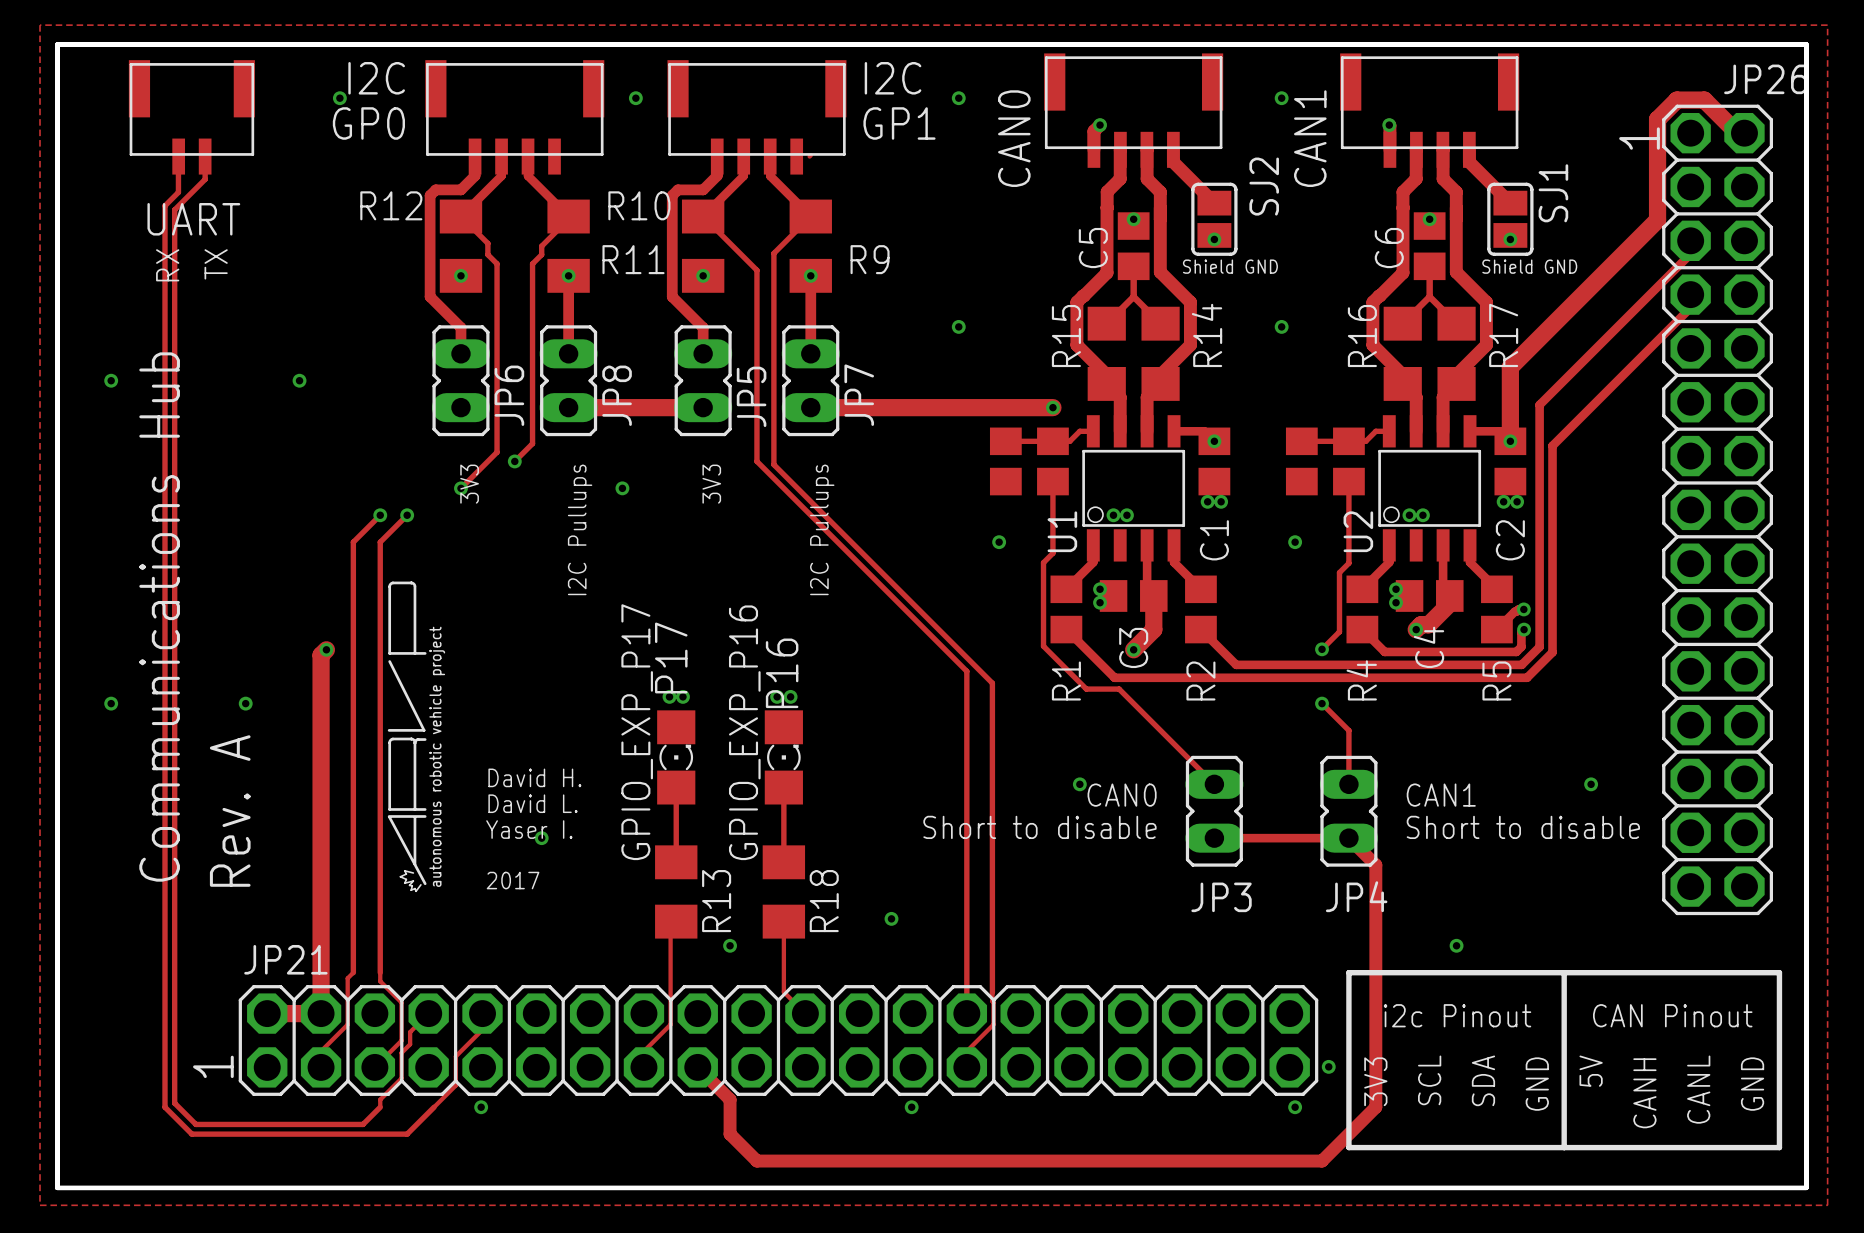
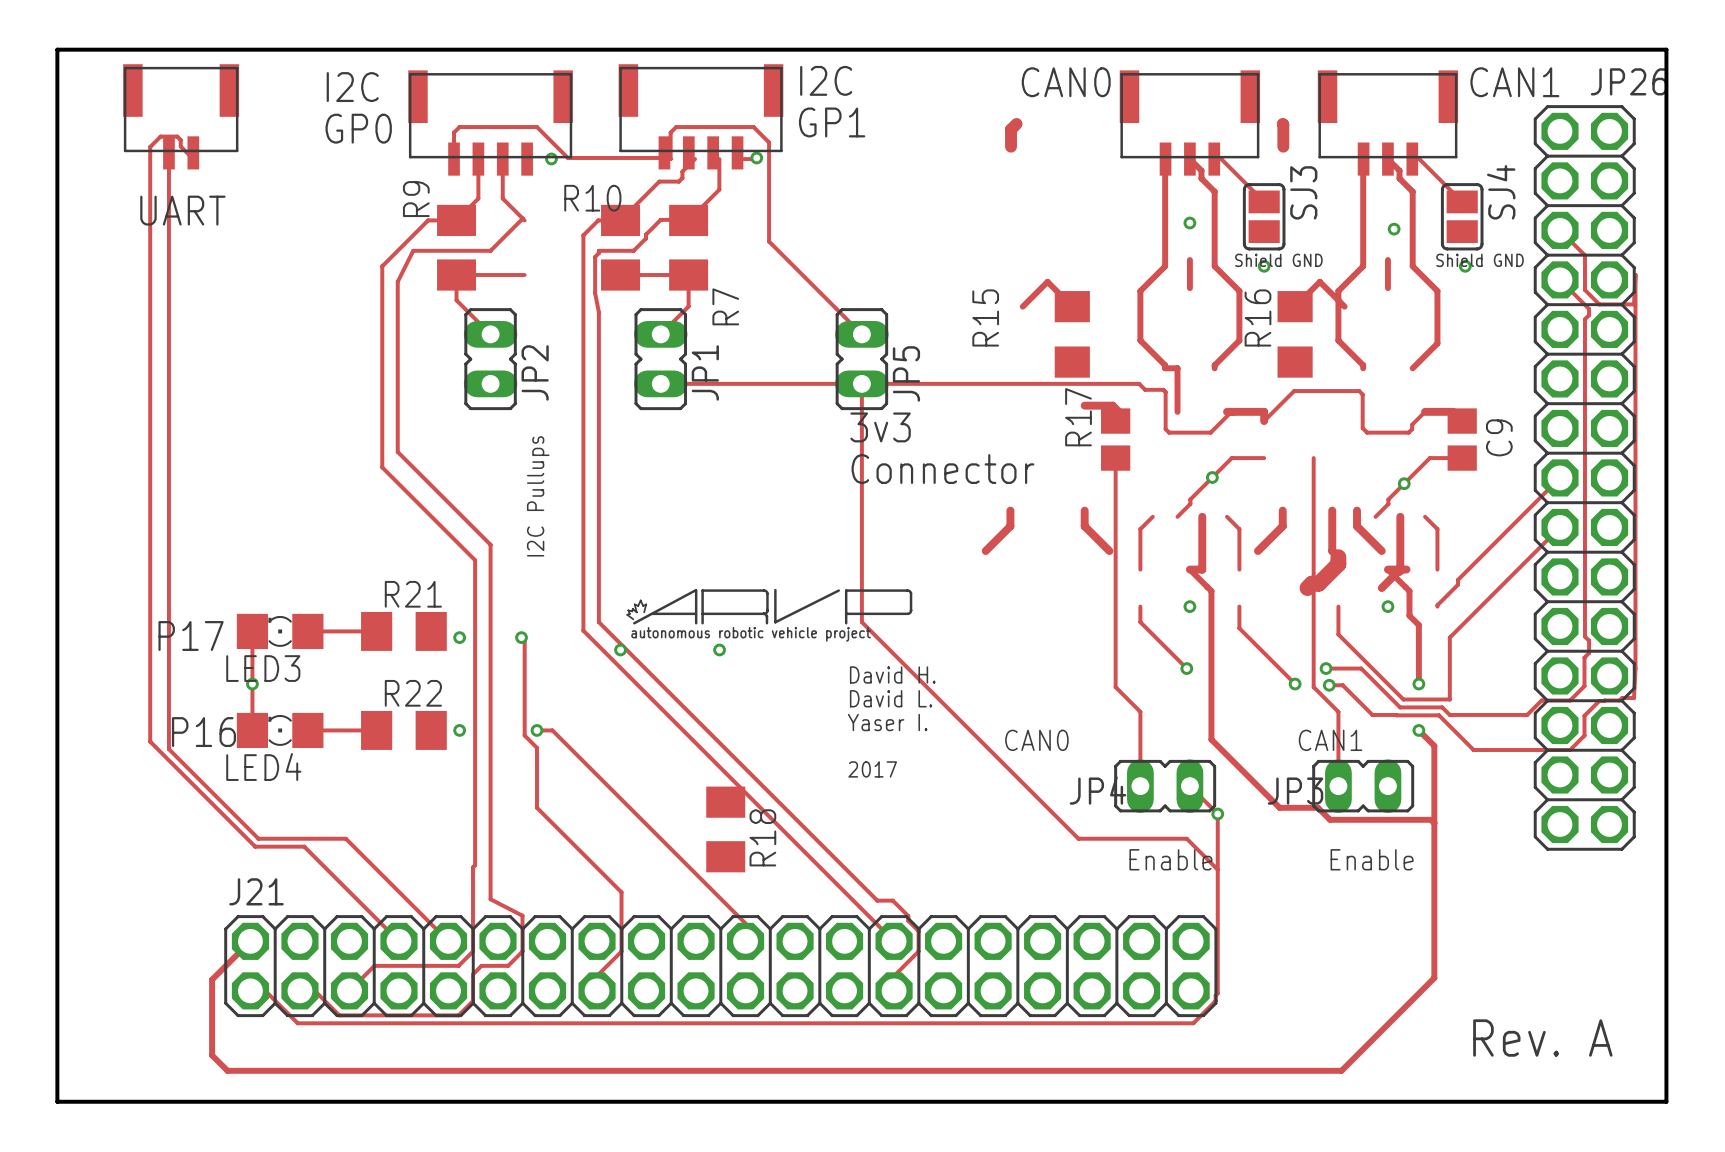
zone outline: (40, 25) (1827, 25) (1827, 1205) (40, 1205) (40, 25) -> none
text position: I2C (376, 78) -> I2C (352, 87)
via: (339, 98) -> none
via: (635, 98) -> none
via: (958, 98) -> none
via: (1281, 98) -> none
part: (1133, 110) -> none
part: (1429, 110) -> none
part position: (514, 117) -> (490, 123)
text position: GP0 (368, 123) -> GP0 (358, 128)
part: none -> (1189, 123)
part: none -> (1387, 123)
via: (1100, 125) -> none
via: (1389, 125) -> none
track: (1744, 133) (1737, 133) (1704, 100) (1676, 100) (1657, 119) (1657, 220) (1510, 367) (1510, 441) (1500, 431) (1470, 431) -> none
text rotation: 0° (1014, 138) -> 90° clockwise (1066, 82)
text position: CAN0 (1014, 138) -> CAN0 (1066, 82)
text rotation: 0° (1310, 138) -> 90° clockwise (1514, 82)
text position: CAN1 (1310, 138) -> CAN1 (1514, 82)
text: 1 (1639, 138) -> none
track: (1173, 149) (1173, 162) (1214, 203) -> none
track: (1469, 149) (1469, 162) (1510, 203) -> none
track: (1120, 150) (1120, 178) (1107, 191) (1107, 207) -> none
track: (1147, 150) (1147, 178) (1160, 192) (1160, 272) (1190, 302) (1190, 345) (1160, 374) (1160, 383) (1147, 397) (1147, 431) -> none
track: (1416, 150) (1416, 178) (1403, 192) (1403, 272) (1372, 302) (1372, 345) (1402, 374) (1402, 383) (1416, 397) (1416, 431) -> none
track: (1443, 150) (1443, 178) (1456, 192) (1456, 272) (1486, 302) (1486, 345) (1456, 374) (1456, 383) (1443, 397) (1443, 431) -> none
track: (810, 155) (809, 156) -> none
track: (178, 156) (178, 192) (164, 205) (164, 1107) (191, 1134) (407, 1134) (455, 1085) (455, 1056) (482, 1029) (482, 1013) -> (168, 159) (168, 749) (258, 838) (345, 838) (448, 941)
track: (205, 156) (205, 179) (174, 209) (174, 1103) (195, 1124) (363, 1124) (380, 1107) (380, 1099) (401, 1078) (401, 1052) (410, 1044) (410, 1032) (428, 1013) -> (193, 159) (180, 146) (180, 140) (177, 136) (160, 136) (150, 147) (150, 741) (255, 846) (304, 846) (398, 941)
track: (475, 156) (475, 175) (460, 189) (435, 189) (430, 195) (430, 296) (460, 327) (460, 353) -> none
track: (501, 156) (501, 175) (460, 216) (487, 243) (487, 254) (497, 263) (497, 452) (460, 488) -> none
track: (528, 156) (528, 175) (568, 216) (568, 219) (541, 246) (541, 254) (532, 263) (532, 443) (514, 461) -> none
track: (717, 156) (717, 175) (703, 189) (677, 189) (672, 195) (672, 296) (703, 327) (703, 353) -> none
track: (743, 156) (743, 175) (703, 216) (756, 270) (756, 461) (966, 671) (966, 1013) -> (695, 159) (682, 171) (682, 178) (678, 181) (659, 181) (620, 220) (598, 220) (583, 235) (583, 630) (894, 941)
track: none -> (756, 157) (743, 159)
via: none -> (756, 157)
track: none -> (454, 159) (454, 132) (459, 127) (536, 127) (567, 157) (670, 159) (670, 132) (676, 127) (753, 127) (769, 142) (769, 241) (861, 334)
track: none -> (502, 159) (502, 198) (524, 220)
via: none -> (551, 158)
track: none -> (1165, 159) (1165, 266) (1140, 291) (1140, 340) (1165, 365) (1165, 368) (1177, 368) (1177, 411)
track: none -> (1189, 159) (1201, 170) (1201, 178) (1214, 191) (1214, 266) (1239, 291) (1239, 340) (1214, 365) (1214, 368)
track: none -> (1214, 159) (1221, 159) (1264, 201)
track: none -> (1363, 159) (1363, 266) (1338, 291) (1338, 340) (1363, 365) (1363, 368)
track: none -> (1387, 159) (1399, 170) (1399, 178) (1412, 191) (1412, 266) (1437, 291) (1437, 343) (1412, 368)
track: none -> (1412, 159) (1419, 159) (1462, 201)
track: (770, 172) (770, 176) (810, 216) (773, 253) (773, 464) (992, 683) (992, 1001) -> (719, 159) (719, 189) (688, 220) (660, 219) (633, 250) (598, 250) (595, 256) (595, 293) (598, 312) (598, 622) (877, 900) (892, 900) (908, 916) (908, 920) (917, 930)
track: (1107, 207) (1107, 272) (1076, 302) (1076, 345) (1106, 374) (1106, 383) (1120, 397) (1120, 431) -> none
via: (1133, 219) -> none
SJ2: (1214, 219) -> none
via: (1429, 219) -> none
SJ1: (1510, 219) -> none
SJ3: none -> (1264, 216)
SJ4: none -> (1462, 216)
via: none -> (1189, 223)
via: (1214, 239) -> none
track: (1690, 240) (1690, 253) (1539, 404) (1539, 646) (1521, 664) (1236, 664) (1200, 629) -> (1559, 230) (1584, 255) (1584, 290) (1599, 304) (1634, 304) (1635, 274) (1634, 698) (1599, 700) (1584, 715) (1584, 735) (1570, 750) (1473, 750) (1438, 715) (1372, 714) (1342, 685) (1329, 685)
R12: (460, 246) -> none
R10 position: (568, 246) -> (620, 247)
R11: (703, 246) -> none
R9 position: (810, 246) -> (456, 247)
C5: (1133, 246) -> none
C6: (1429, 246) -> none
R7: none -> (688, 247)
R9 name rotation: 0° (870, 259) -> 90° counterclockwise (416, 199)
R9 name position: R9 (870, 259) -> R9 (416, 199)
text: TX (216, 264) -> none
text: RX (167, 265) -> none
track: (1133, 266) (1133, 296) -> (1189, 260) (1189, 288)
text: Shield GND (1230, 266) -> none
track: (1429, 266) (1429, 296) -> (1387, 260) (1387, 288)
text position: Shield GND (1529, 266) -> Shield GND (1480, 260)
text: none -> Shield GND (1278, 260)
via: (460, 275) -> none
track: (568, 275) (568, 353) -> none
via: (568, 275) -> none
via: (703, 275) -> none
track: (810, 275) (810, 353) -> none
via: (810, 275) -> none
via: none -> (1264, 266)
via: none -> (1465, 266)
track: none -> (524, 275) (456, 275) (456, 300) (490, 334)
track: none -> (620, 275) (688, 275) (688, 306) (660, 334)
track: (1690, 294) (1690, 307) (1552, 445) (1552, 652) (1527, 677) (1114, 677) (1066, 629) -> (1559, 279) (1589, 308) (1589, 315) (1584, 319) (1584, 636) (1589, 640) (1589, 653) (1584, 657) (1584, 686) (1570, 700) (1541, 700) (1527, 714) (1449, 714) (1442, 707) (1400, 707) (1361, 668) (1326, 668)
R17 footprint: [1437, 306, 1476, 401] -> [1101, 408, 1131, 471]
via: (958, 326) -> none
via: (1281, 326) -> none
R17 name position: R17 (1503, 335) -> R17 (1078, 417)
R14: (1106, 353) -> none
via: (111, 380) -> none
via: (299, 380) -> none
JP6: (460, 380) -> none
JP2: none -> (490, 359)
JP8: (568, 380) -> none
JP5 position: (703, 380) -> (861, 359)
JP1: none -> (660, 359)
JP7: (810, 380) -> none
track: (568, 407) (703, 407) -> none
track: none -> (660, 383) (750, 383)
track width: thick (810, 407) (1052, 407) -> thin (750, 383) (973, 383)
track: none -> (861, 383) (861, 622) (1078, 838) (1186, 838) (1217, 869)
track: none -> (973, 383) (1139, 383) (1145, 389) (1163, 389) (1165, 392) (1165, 429) (1169, 432) (1210, 432) (1233, 411)
via: (1052, 407) -> none
track: (1093, 431) (1079, 431) (1069, 441) (1005, 441) -> none
track: (1389, 431) (1375, 431) (1365, 441) (1301, 441) -> none
track: none -> (1227, 411) (1264, 411) (1264, 421) (1294, 391) (1359, 391) (1362, 394) (1362, 428) (1367, 432) (1408, 432) (1412, 429) (1412, 424) (1425, 411) (1453, 411) (1462, 421)
via: (1214, 441) -> none
via: (1510, 441) -> none
text: none -> 3v3 (880, 427)
via: (514, 461) -> none
part: (1005, 461) -> none
part: (1052, 461) -> none
C1: (1214, 461) -> none
part: (1301, 461) -> none
part: (1348, 461) -> none
C2: (1510, 461) -> none
C9: none -> (1462, 439)
track: (1052, 481) (1052, 553) (1043, 562) (1043, 646) (1086, 689) (1119, 689) (1214, 784) -> none
track: (1348, 481) (1348, 563) (1339, 572) (1339, 631) (1322, 649) -> none
text: 3V3 (469, 484) -> none
text: 3V3 (711, 484) -> none
via: (460, 488) -> none
via: (622, 488) -> none
U1: (1133, 488) -> none
track: none -> (1115, 458) (1115, 687) (1140, 711) (1140, 786)
track: none -> (1264, 458) (1231, 458) (1190, 499) (1190, 503) (1177, 516)
track: none -> (1313, 458) (1313, 687) (1338, 711) (1338, 786)
U2: (1429, 488) -> none
track: none -> (1462, 458) (1429, 458) (1388, 499) (1388, 503) (1375, 516)
text: none -> Connector (942, 469)
via: (1207, 501) -> none
via: (1221, 501) -> none
via: (1503, 501) -> none
via: (1517, 501) -> none
track: none -> (1559, 477) (1458, 579) (1458, 584) (1437, 606)
track: (380, 515) (353, 542) (353, 972) (347, 978) (347, 1024) (321, 1051) (321, 1067) -> (522, 218) (490, 250) (413, 250) (397, 281) (397, 451) (490, 544) (490, 899) (522, 915) (522, 951) (508, 965) (481, 965) (473, 974) (473, 1001) (458, 1015) (339, 1015) (314, 990) (299, 990)
via: (380, 515) -> none
track: (407, 515) (380, 542) (380, 981) (401, 1002) (401, 1040) -> (478, 159) (478, 198) (456, 220) (428, 220) (382, 266) (382, 467) (475, 560) (475, 865) (473, 867) (473, 951) (458, 965) (373, 966)
via: (407, 515) -> none
via: (1113, 515) -> none
via: (1126, 515) -> none
via: (1409, 515) -> none
via: (1422, 515) -> none
via: none -> (1404, 483)
text: I2C Pullups (822, 529) -> none
via: (999, 542) -> none
via position: (1295, 542) -> (1212, 477)
track: (1147, 545) (1147, 589) (1153, 595) (1153, 629) (1133, 649) -> none
track: none -> (1152, 516) (1140, 529) (1140, 569)
track: none -> (1202, 516) (1202, 569) (1189, 569) (1211, 591) (1211, 739) (1279, 807) (1318, 807) (1330, 819) (1430, 819) (1434, 823)
track: none -> (1227, 516) (1239, 529) (1239, 569)
track: none -> (1400, 516) (1400, 569) (1387, 569) (1409, 591) (1409, 615) (1418, 625) (1418, 684)
track: none -> (1425, 516) (1437, 529) (1437, 569)
track: none -> (1559, 527) (1449, 637) (1449, 699) (1403, 699) (1338, 634) (1338, 606)
drawing: [387, 581, 427, 892] -> none
via: (1100, 589) -> none
via: (1396, 589) -> none
C3: (1133, 595) -> none
C4: (1429, 595) -> none
via: (1100, 602) -> none
via: (1396, 602) -> none
R1: (1066, 609) -> none
R2: (1200, 609) -> none
R4: (1362, 609) -> none
R5: (1496, 609) -> none
via: (1523, 609) -> none
text: Communications Hub (159, 617) -> none
track: (1362, 629) (1384, 651) (1516, 651) (1521, 646) (1521, 632) (1524, 629) -> none
via: (1416, 629) -> none
via: (1524, 629) -> none
drawing: none -> [626, 588, 913, 625]
track: (326, 649) (321, 655) (321, 1013) (267, 1013) -> (1418, 730) (1434, 745) (1434, 977) (1341, 1070) (227, 1070) (212, 1055) (212, 979) (250, 941)
via: (326, 649) -> none
via: (1133, 649) -> none
track: none -> (1140, 606) (1140, 622) (1186, 668)
via: none -> (1189, 606)
via: (1322, 649) -> none
track: none -> (1239, 606) (1239, 628) (1295, 684)
via: none -> (1387, 606)
text rotation: 0° (671, 657) -> 90° clockwise (191, 636)
text position: P17 (671, 657) -> P17 (191, 636)
text: P16 (782, 673) -> none
track: none -> (252, 631) (252, 730)
LED3: none -> (280, 631)
track: none -> (307, 631) (376, 631)
R21: none -> (403, 631)
via: none -> (459, 637)
via: none -> (521, 637)
via: (682, 696) -> none
via: (790, 696) -> none
via: (111, 703) -> none
via position: (245, 703) -> (252, 684)
track: (1322, 703) (1348, 730) (1348, 784) -> none
via: (1322, 703) -> none
via: none -> (1186, 668)
via: none -> (1326, 668)
via: none -> (1295, 684)
via: none -> (1418, 684)
via: none -> (1329, 685)
GPIO_EXP_P17: (676, 757) -> none
GPIO_EXP_P16: (783, 757) -> none
text position: David H. (534, 777) -> David H. (892, 674)
LED4: none -> (280, 730)
track: none -> (307, 730) (376, 730)
R22: none -> (403, 730)
via: none -> (459, 730)
via: none -> (536, 730)
via: (1079, 784) -> none
via: none -> (1418, 730)
via: (1591, 784) -> none
text: none -> P16 (203, 732)
track: (676, 787) (676, 862) -> none
track: (783, 787) (783, 862) -> none
text position: David L. (533, 803) -> David L. (891, 698)
text: Rev. A (230, 811) -> none
JP3 rotation: 0° (1214, 811) -> 90° clockwise (1363, 786)
JP3 position: (1214, 811) -> (1363, 786)
JP4 rotation: 0° (1348, 811) -> 90° clockwise (1165, 786)
JP4 position: (1348, 811) -> (1165, 786)
text: Short to disable (1039, 827) -> none
text: Short to disable (1523, 827) -> none
text position: Yaser I. (529, 829) -> Yaser I. (887, 722)
via: (541, 838) -> none
track: (1214, 838) (1348, 838) (1375, 865) (1375, 1107) (1322, 1161) (756, 1161) (730, 1134) (730, 1099) (697, 1067) -> none
track: none -> (1189, 786) (1217, 813) (1217, 993) (1215, 1001) (1193, 1023) (297, 1023) (265, 990) (250, 990)
via: none -> (1217, 813)
text position: 2017 (513, 880) -> 2017 (872, 769)
R13: (676, 891) -> none
via: (891, 918) -> none
track: (676, 921) (670, 927) (670, 960) -> (521, 637) (524, 640) (524, 735) (536, 747) (536, 807) (621, 892)
track: (783, 921) (783, 992) (805, 1013) -> (536, 730) (552, 730) (745, 923) (745, 941)
text: none -> Enable (1170, 859)
text: none -> Enable (1372, 859)
via: (730, 945) -> none
via: (1456, 945) -> none
JP21 name: JP21 (285, 959) -> J21 (256, 891)
line: (1348, 972) (1348, 1147) (1779, 1147) (1779, 972) (1348, 972) -> none
line: (1564, 972) (1564, 1147) -> none
text: i2c Pinout (1457, 1015) -> none
text: CAN Pinout (1672, 1015) -> none
text: 1 (213, 1066) -> none
via: (1328, 1066) -> none
text: 5V (1591, 1071) -> none
text: SCL (1429, 1080) -> none
text: SDA (1483, 1080) -> none
text: 3V3 (1375, 1081) -> none
text: GND (1537, 1084) -> none
text: GND (1752, 1084) -> none
text: CANL (1698, 1089) -> none
text: CANH (1644, 1093) -> none
via: (481, 1107) -> none
via: (911, 1107) -> none
via: (1295, 1107) -> none
text: none -> Rev. A (1542, 1038)

